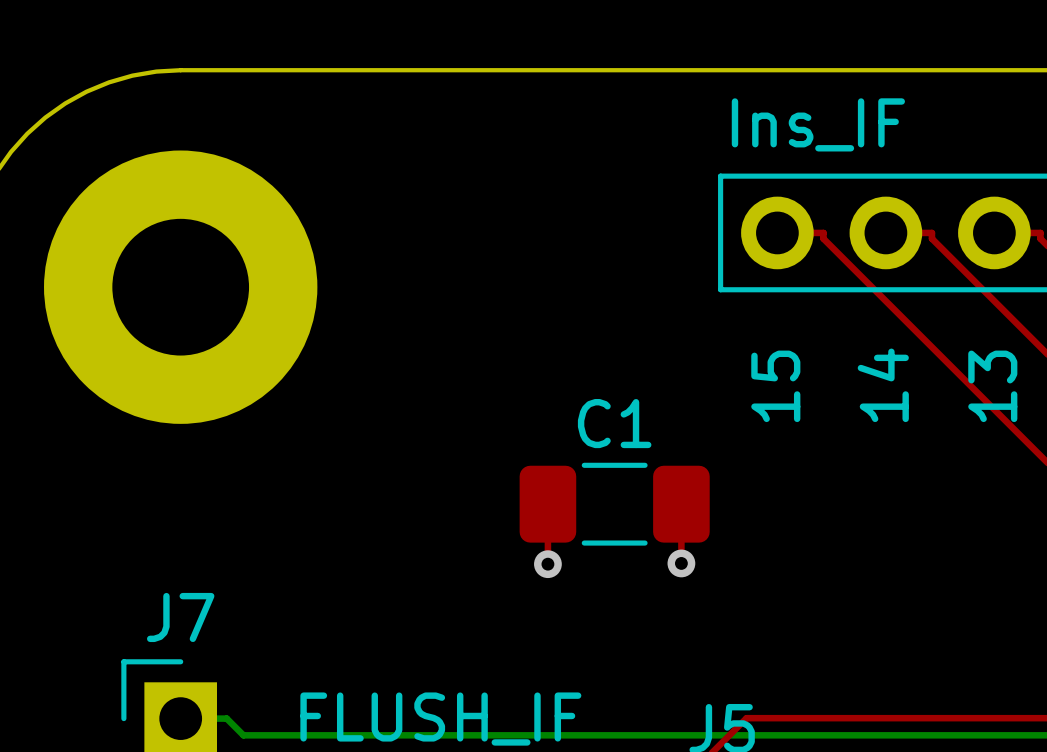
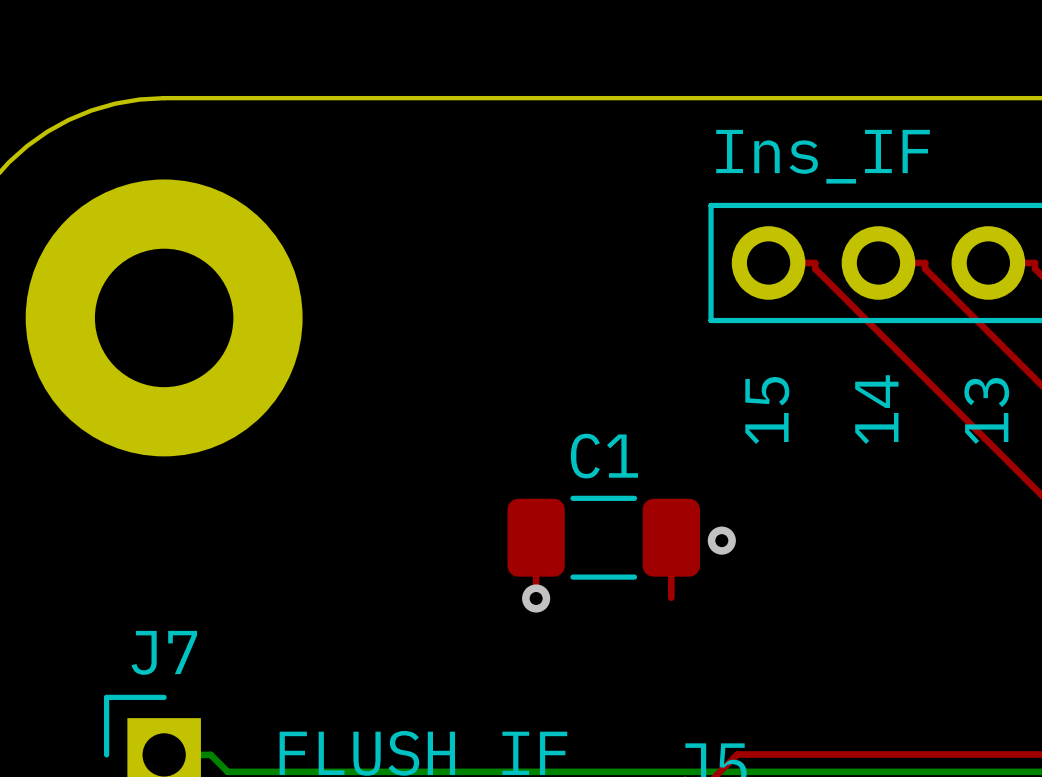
via position: (681, 563) -> (721, 540)

